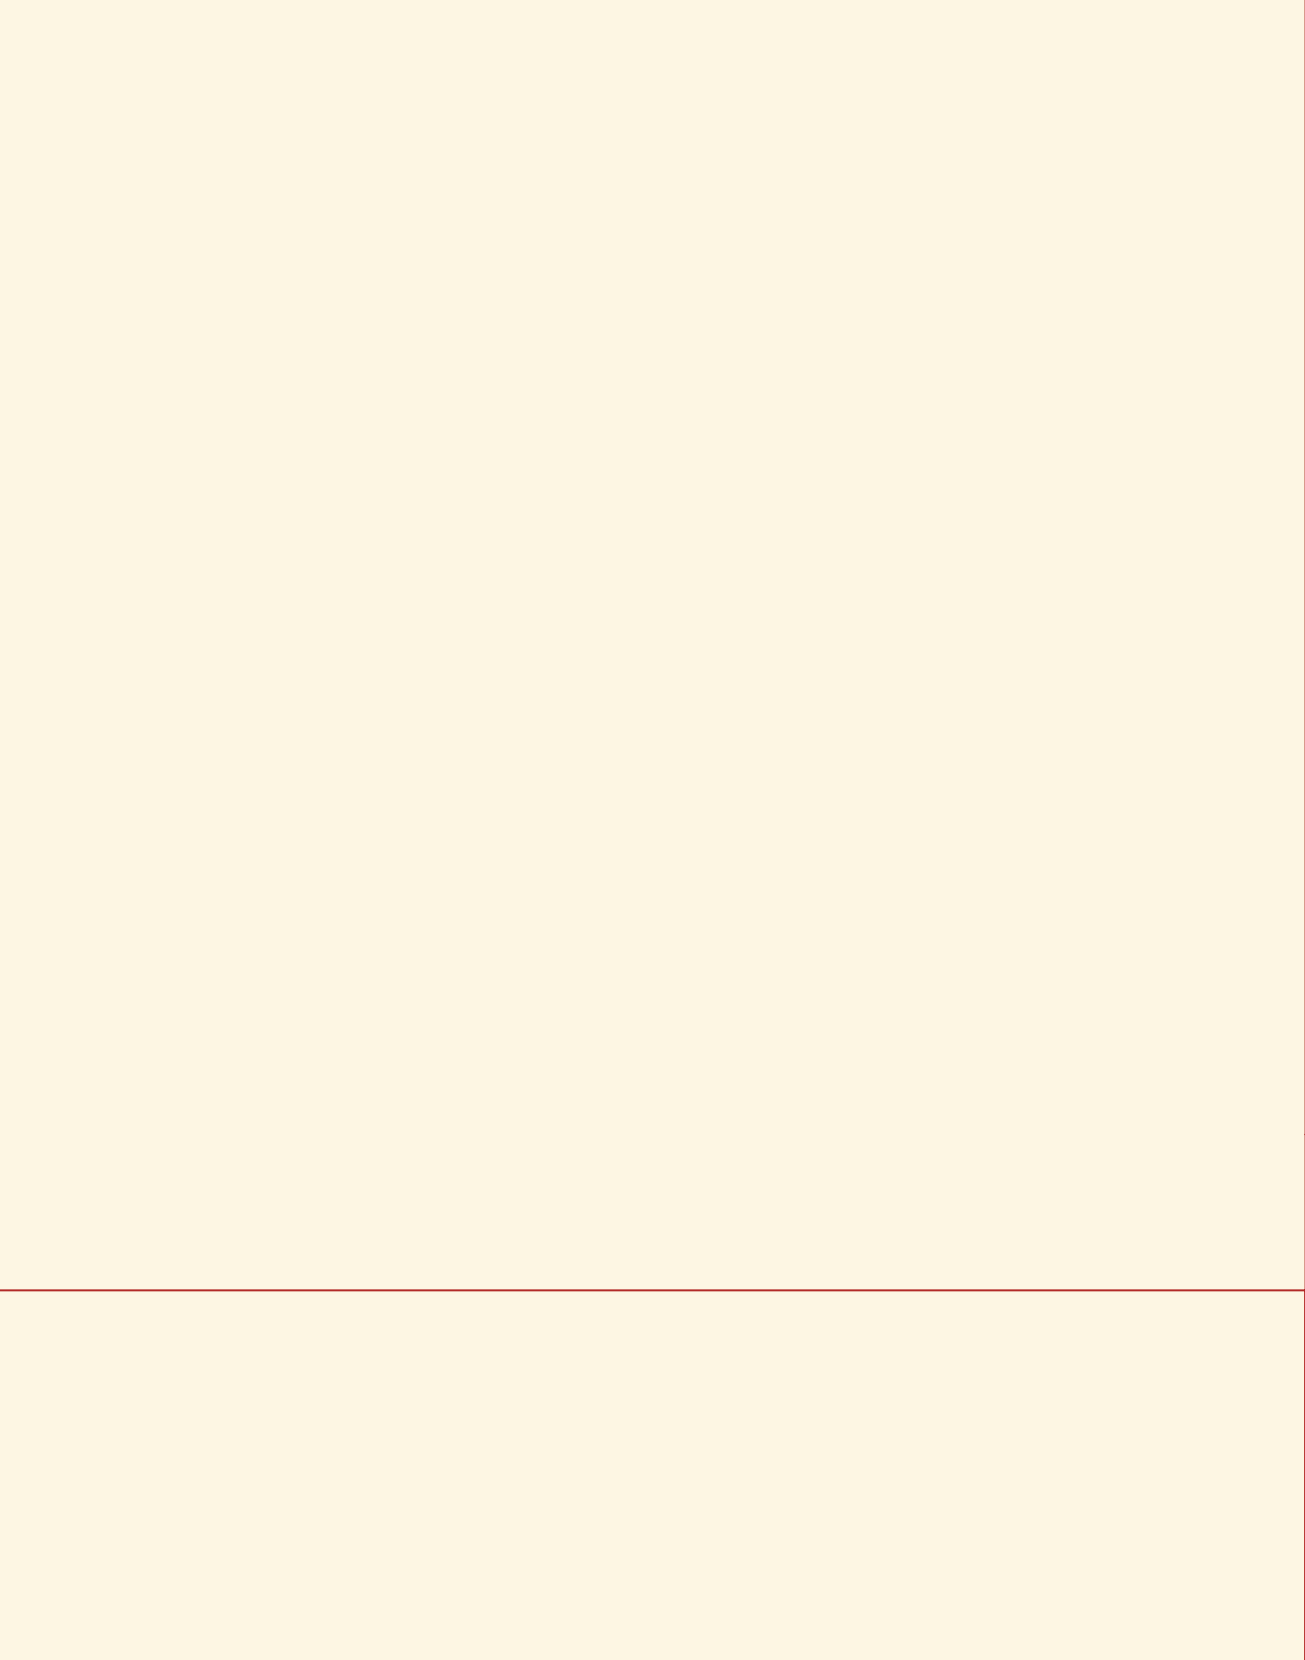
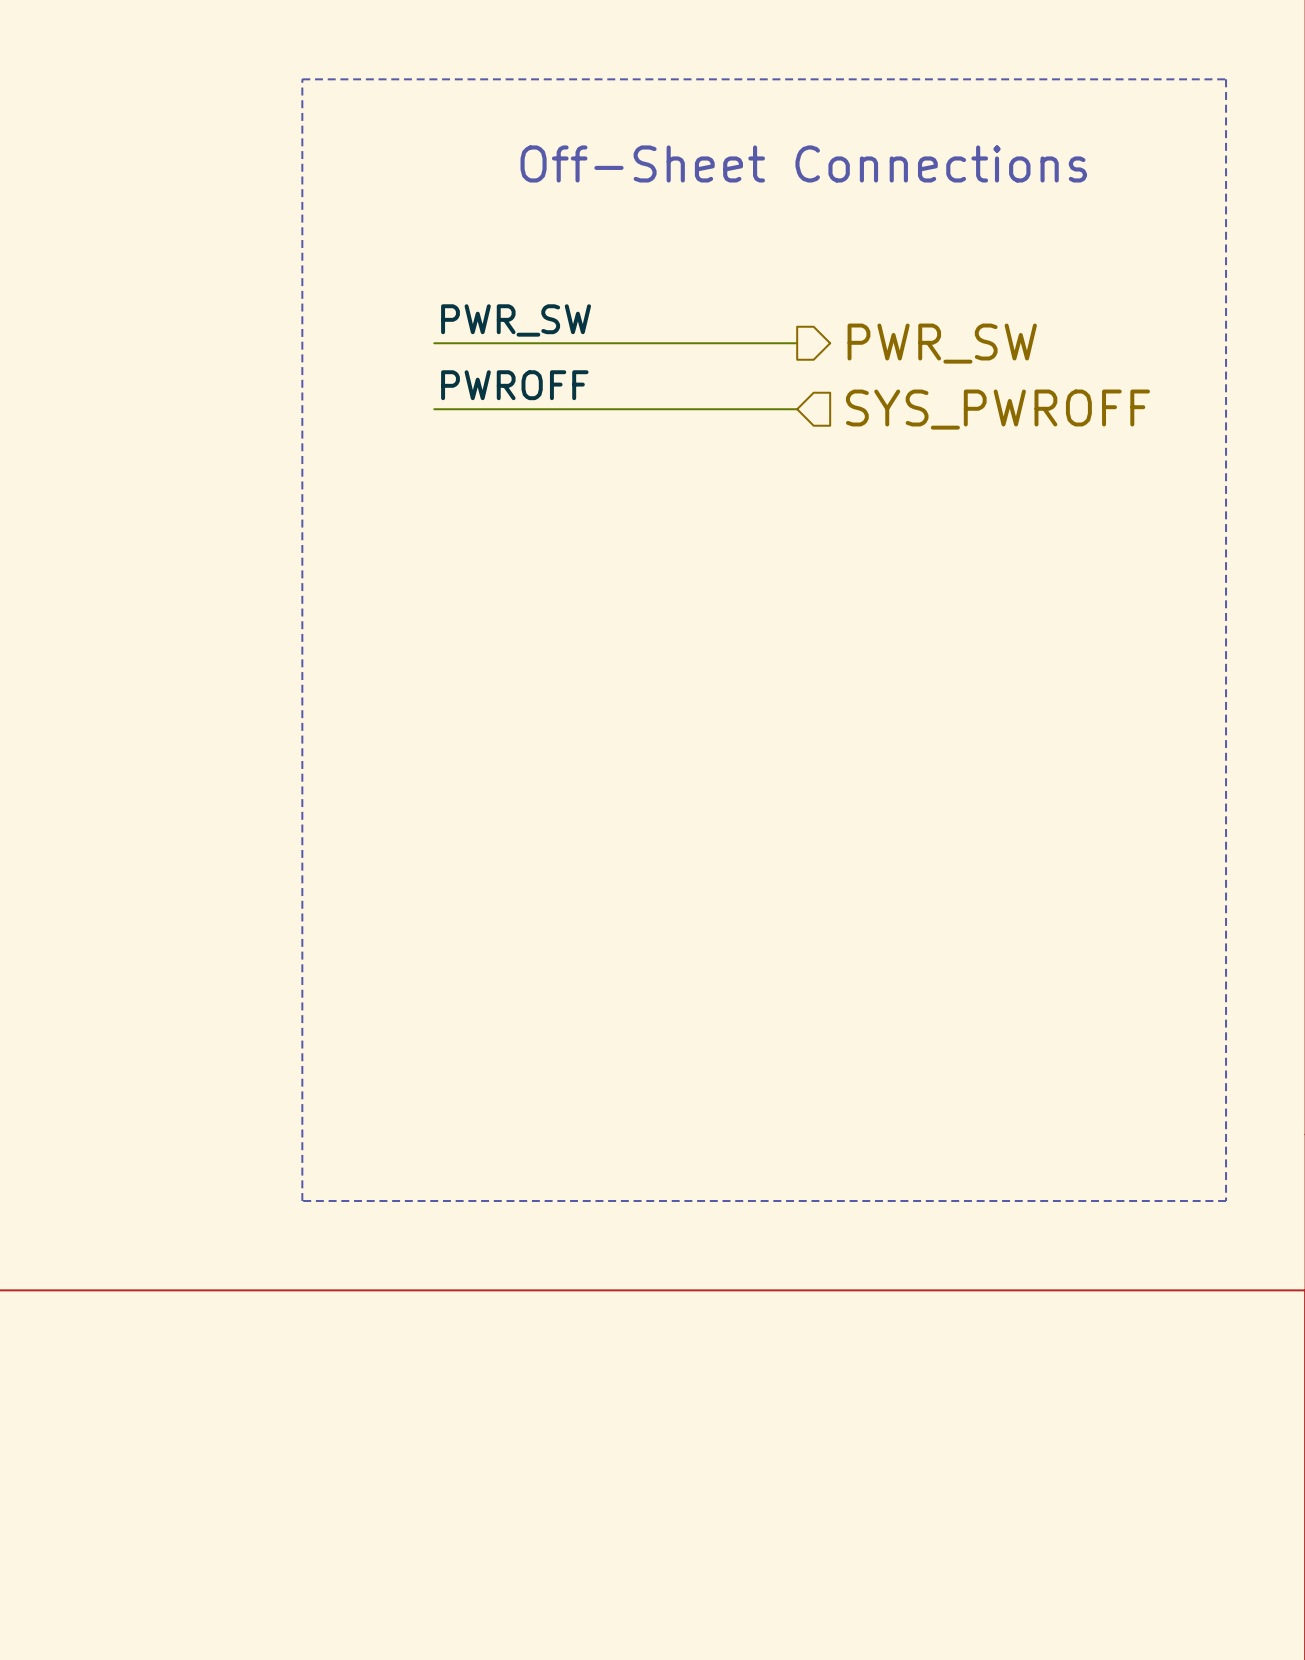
line: none -> (302, 79) (1226, 79) (1226, 1200) (302, 1200) (302, 79)
text: none -> Off-Sheet Connections (803, 163)
label: none -> PWR_SW (516, 320)
wire: none -> (434, 343) (797, 343)
hierarchical label: none -> PWR_SW (942, 343)
label: none -> PWROFF (514, 385)
wire: none -> (434, 409) (797, 409)
hierarchical label: none -> SYS_PWROFF (997, 409)

